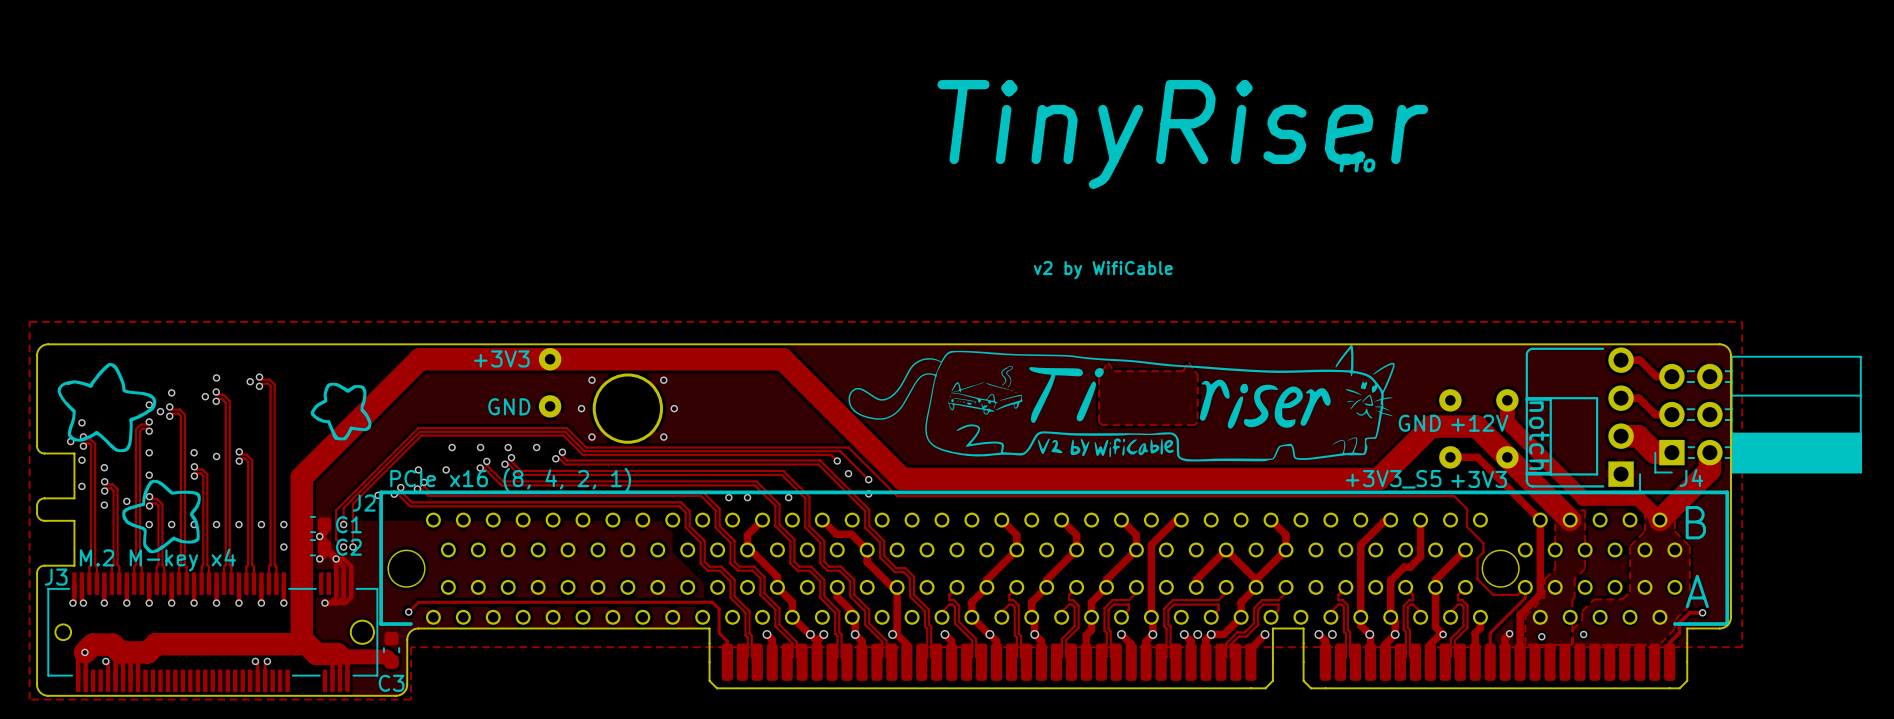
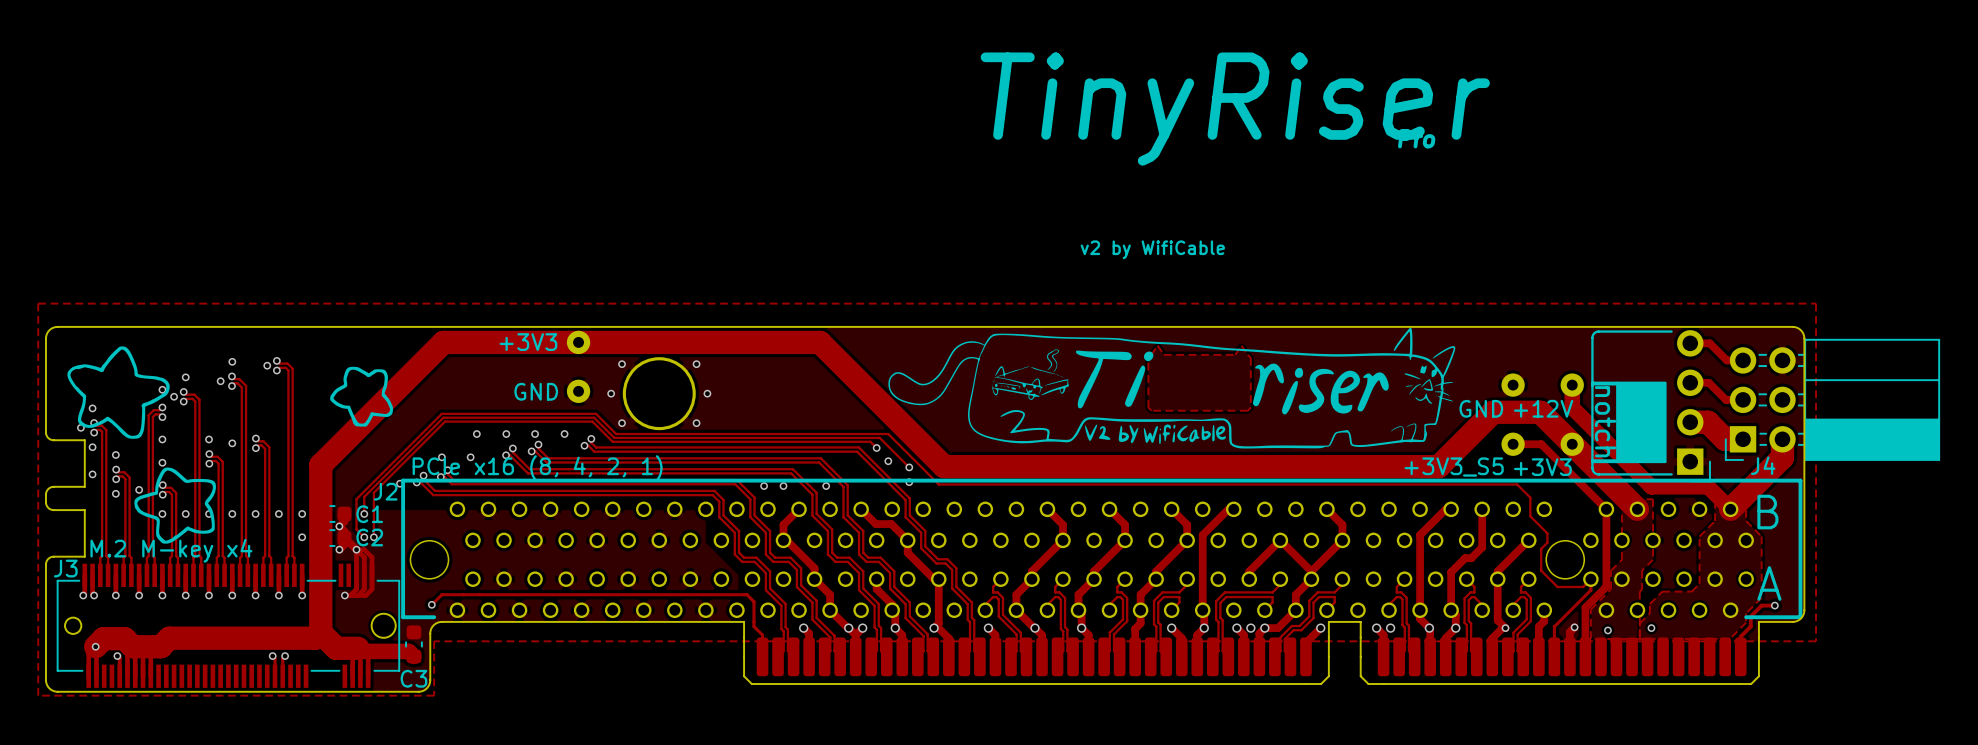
drawing: none -> [1616, 381, 1667, 464]
line: (1550, 398) (1597, 398) (1597, 474) (1550, 474) (1550, 398) -> none

